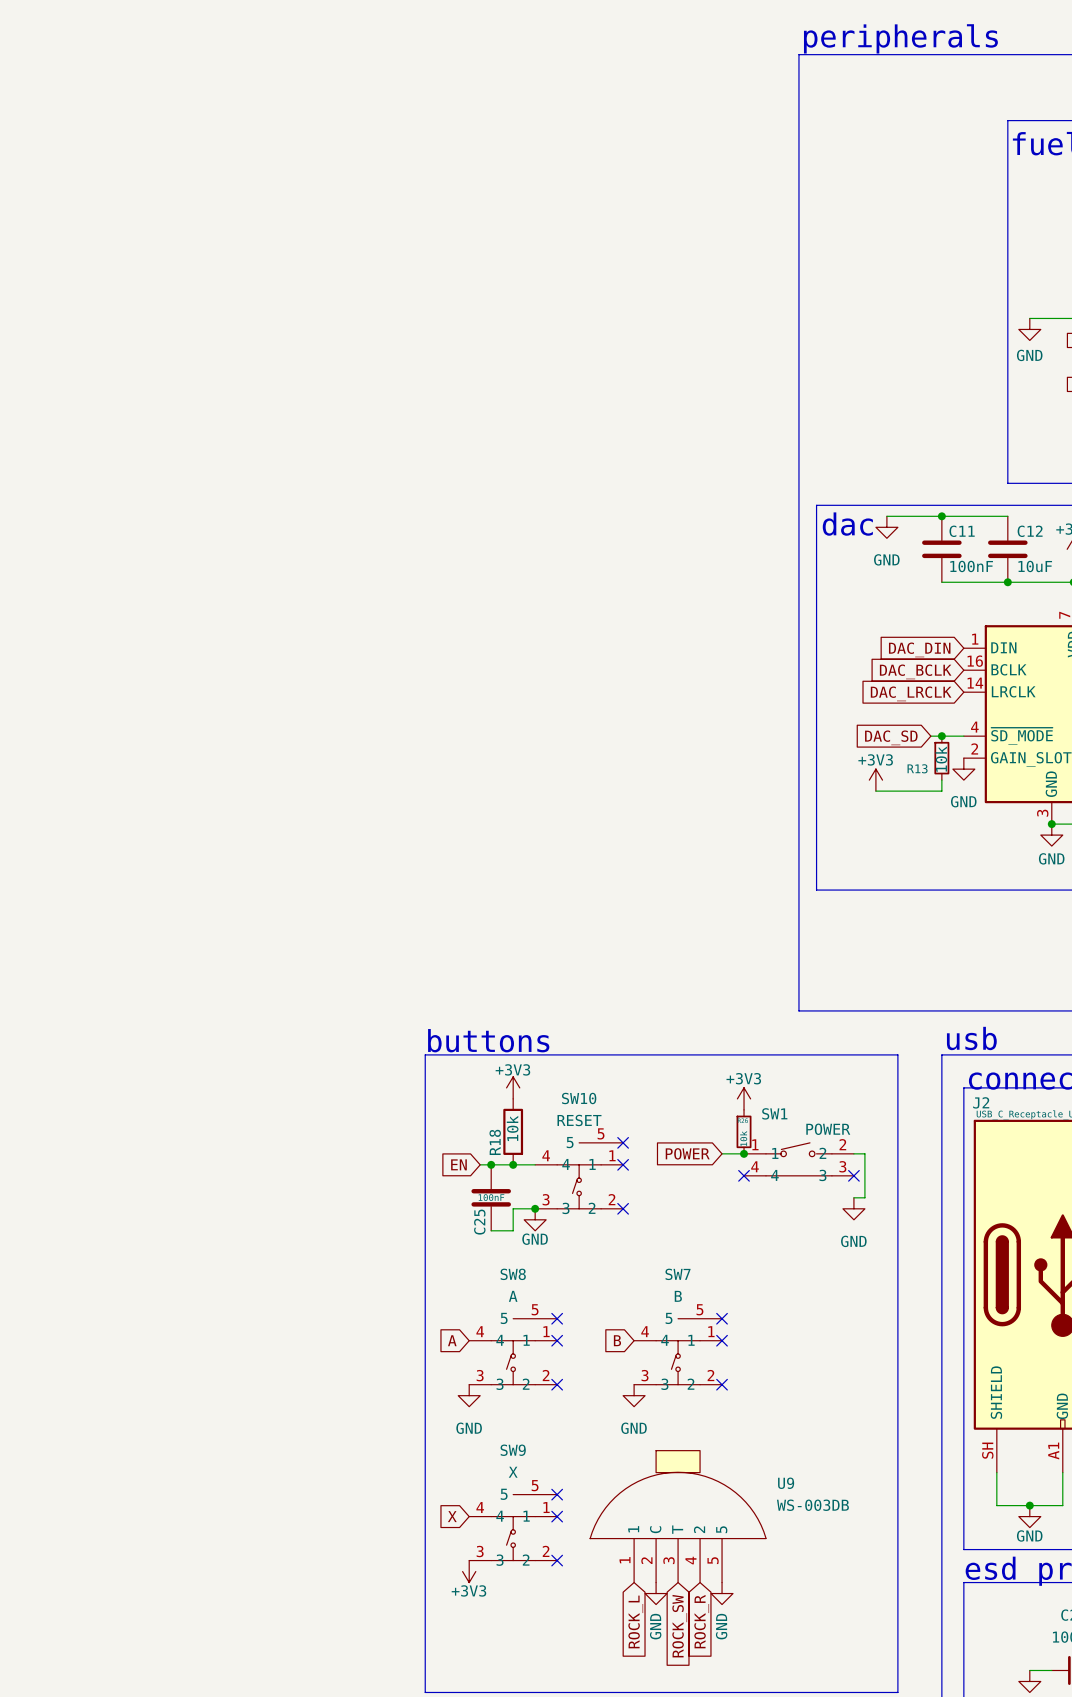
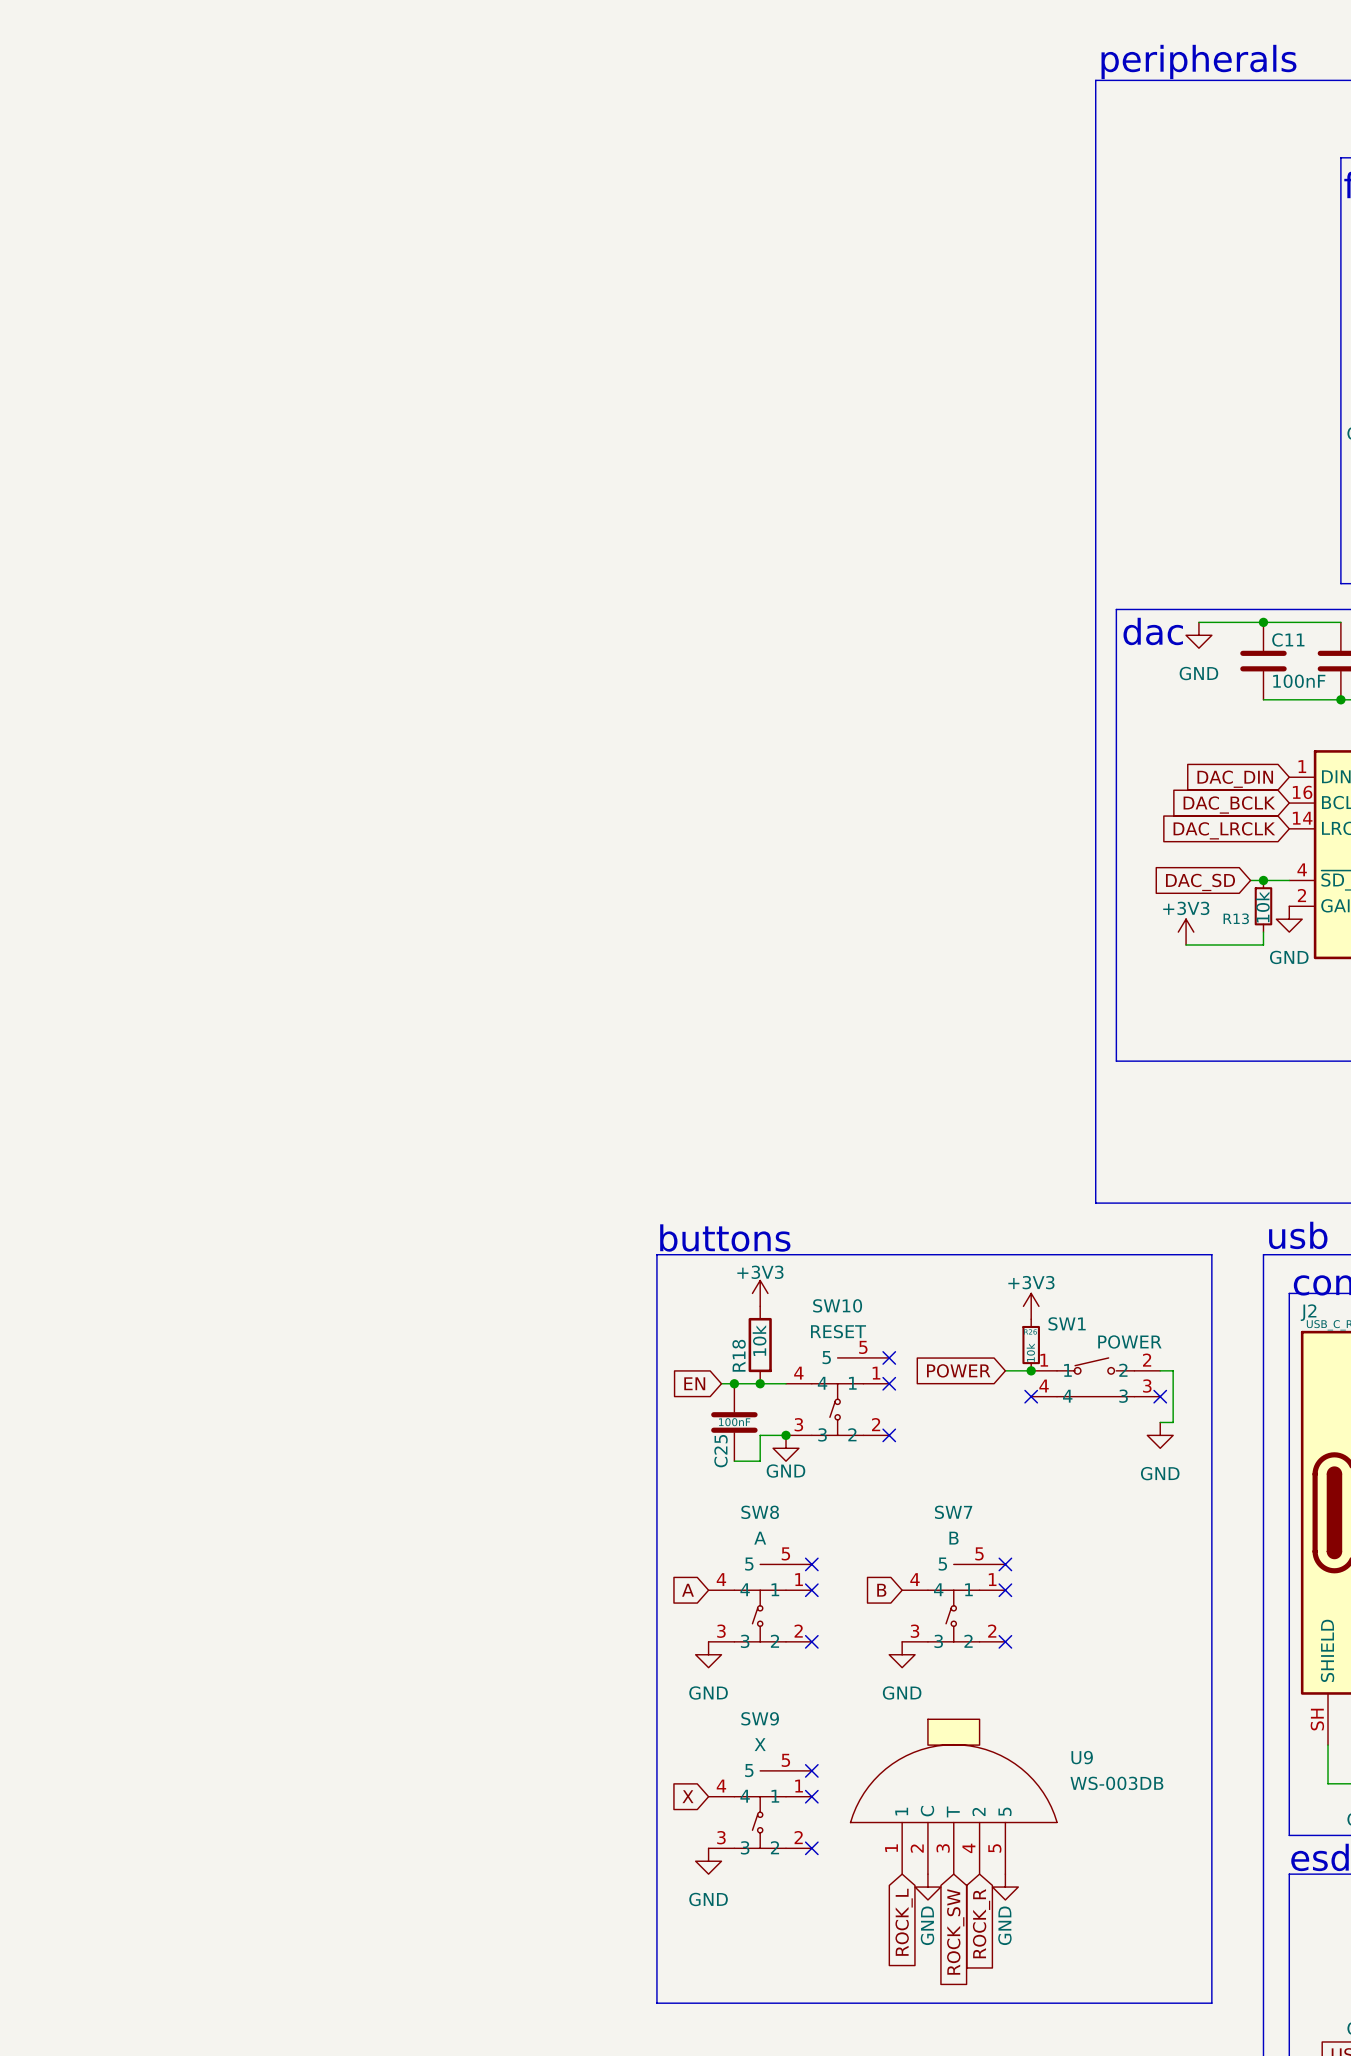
power symbol: +3V3 (469, 1571) -> GND (708, 1861)

